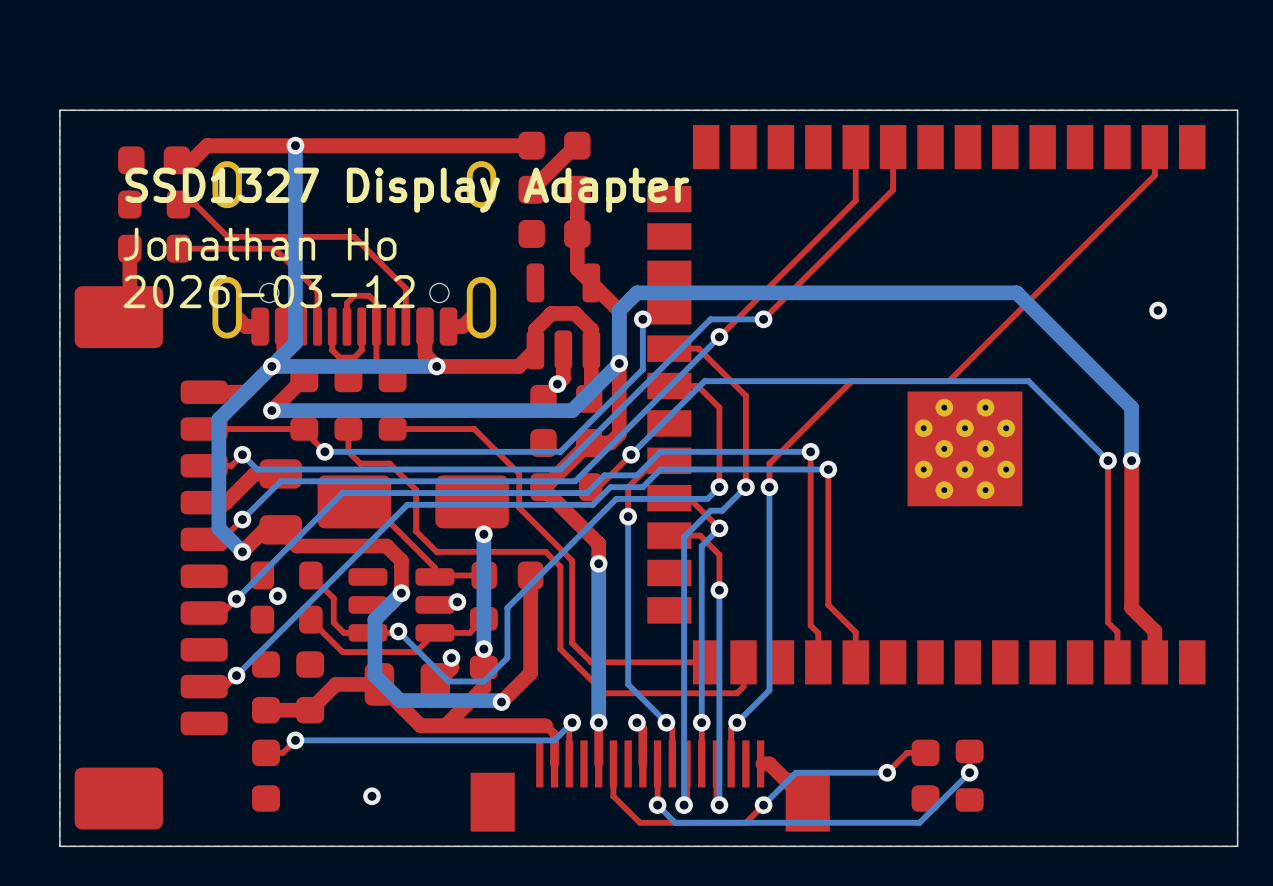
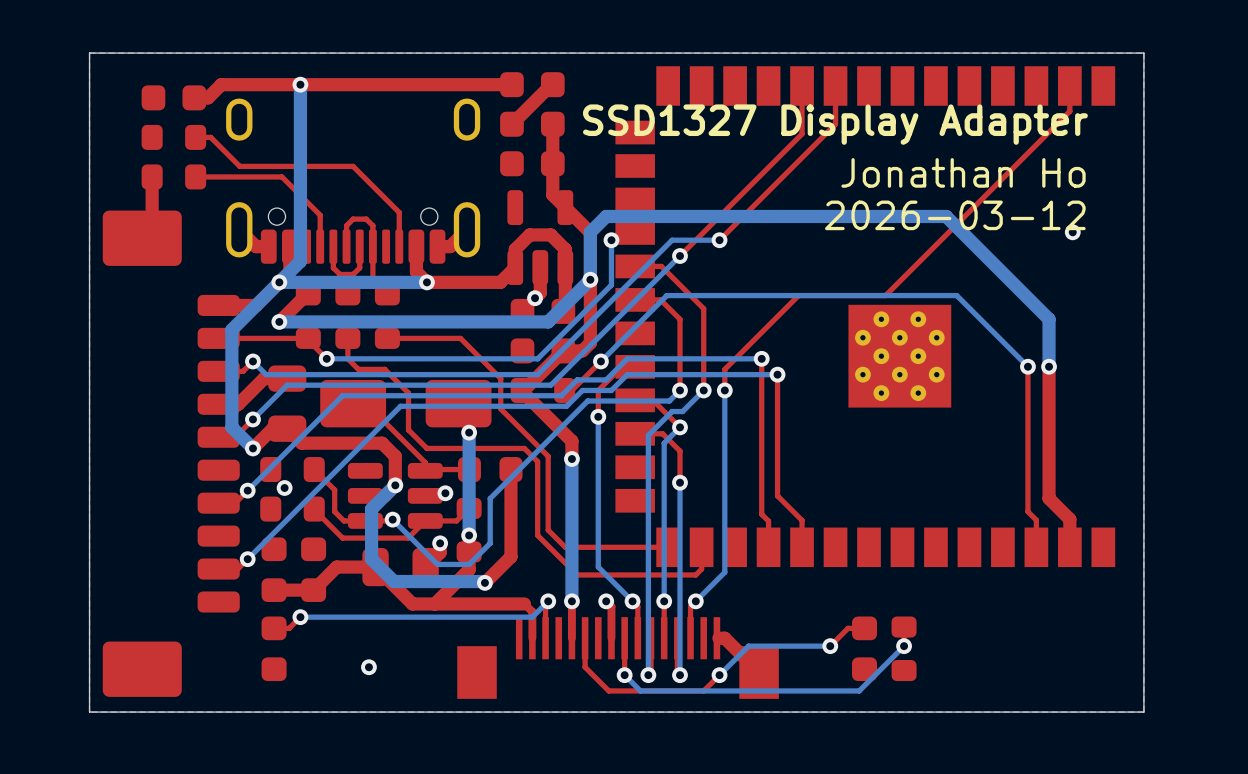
text: SSD1327 Display Adapter (407, 190) -> none
text: none -> SSD1327 Display Adapter (835, 124)
text: Jonathan Ho (260, 244) -> none
text: none -> Jonathan Ho (963, 172)
text: 2026-03-12 (269, 291) -> none
text: none -> 2026-03-12 (955, 215)

